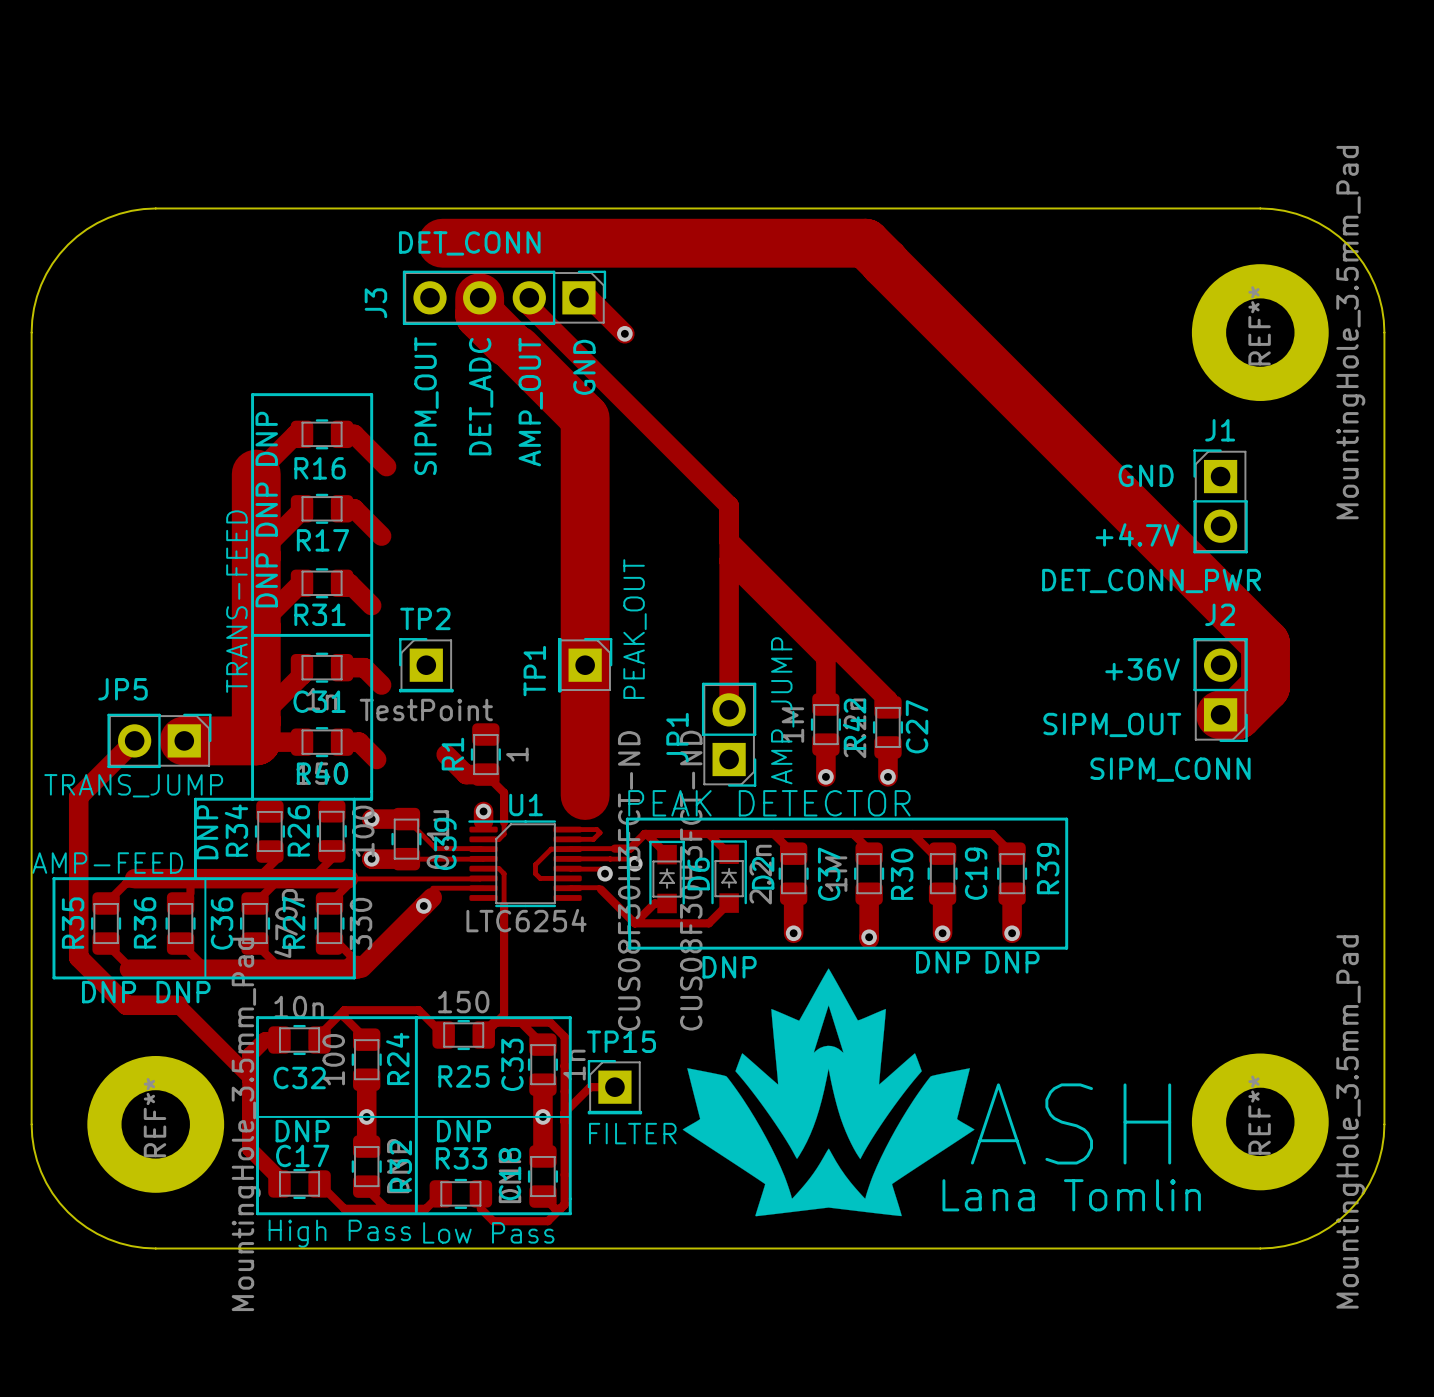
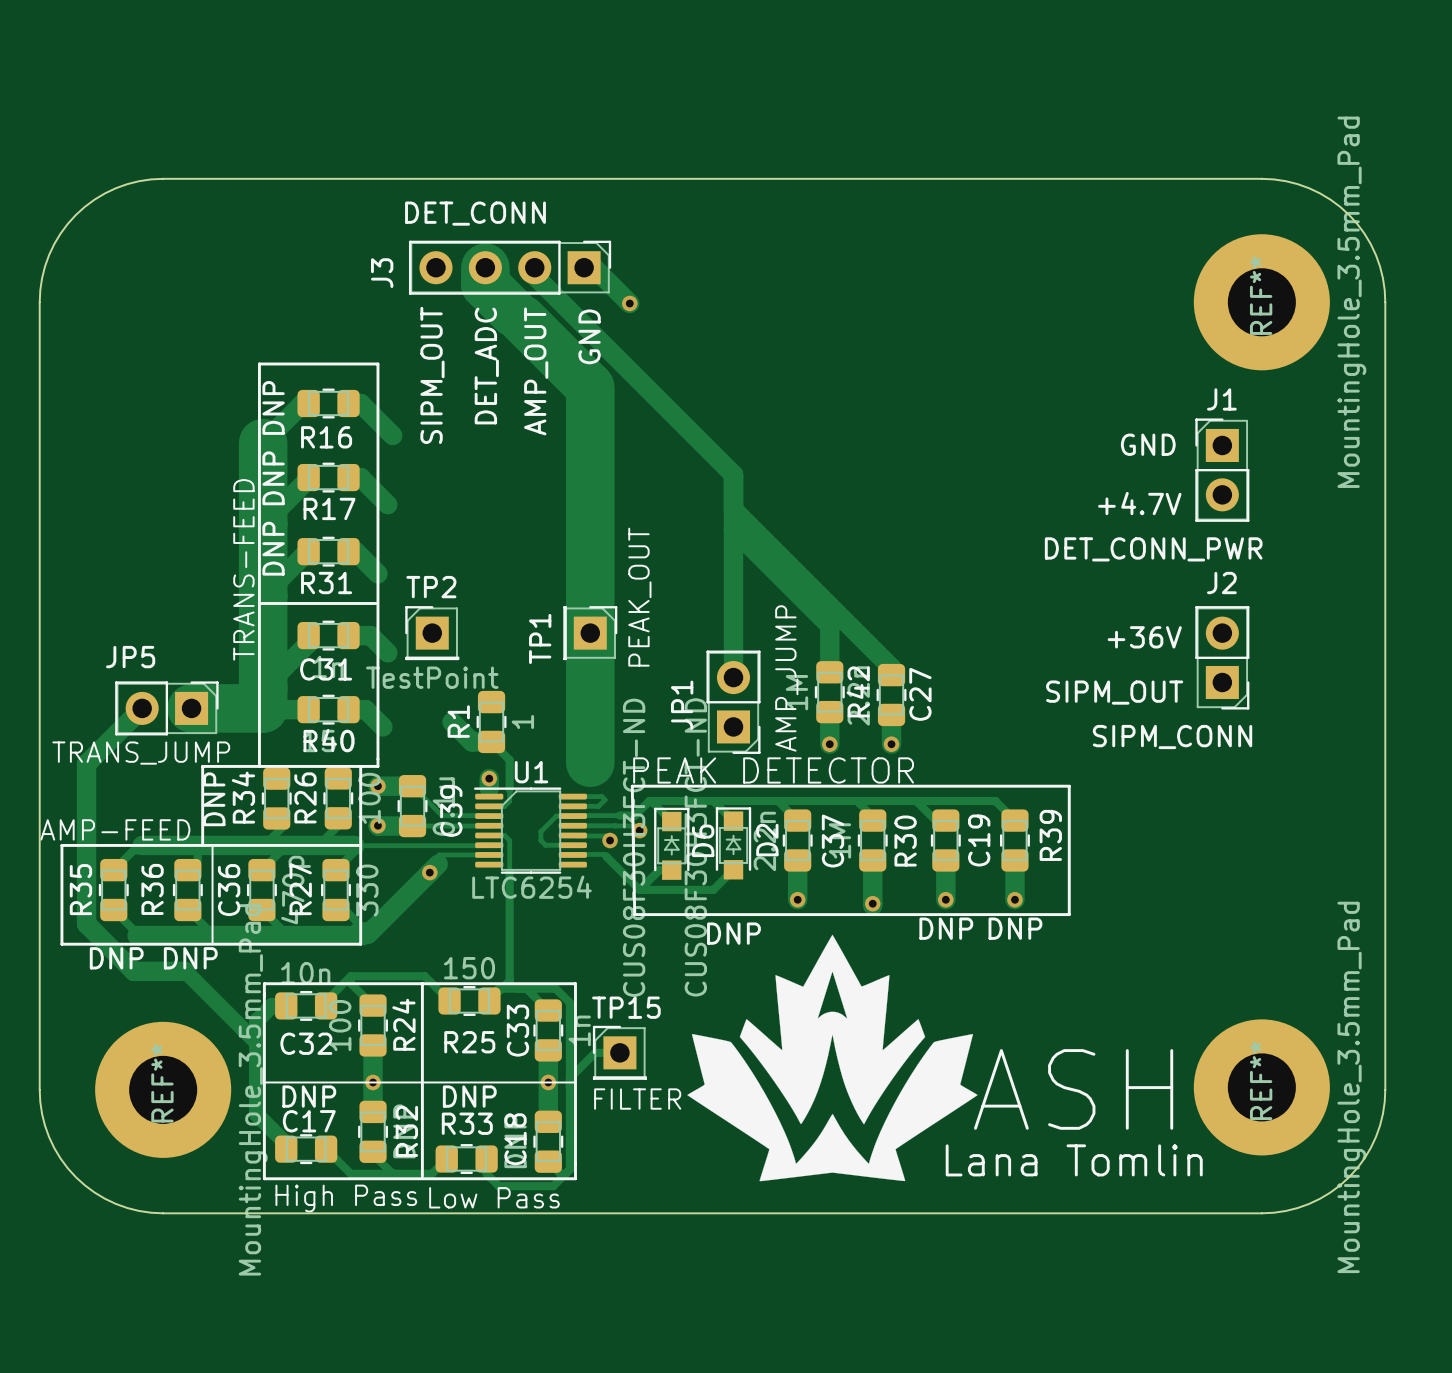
track: (442, 243) (865, 243) (1265, 643) (1265, 686) (1237, 714) (1220, 714) -> none

